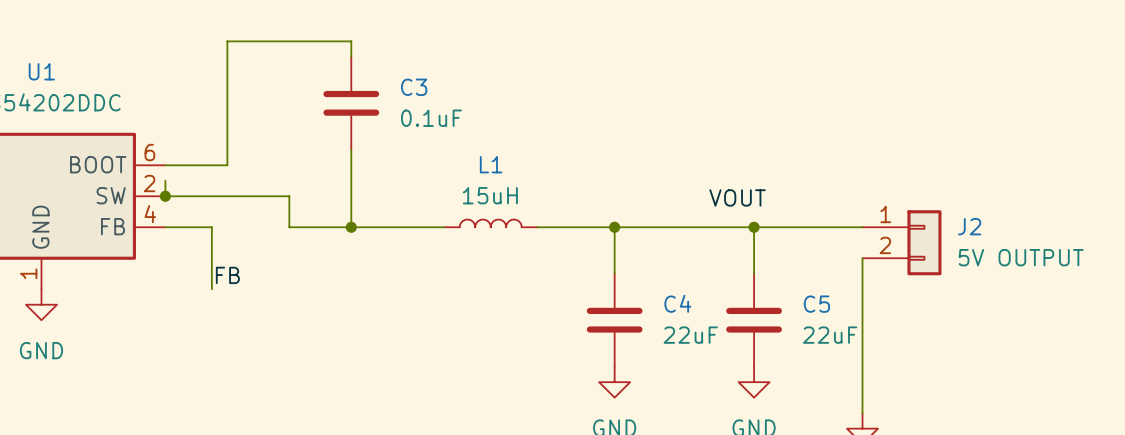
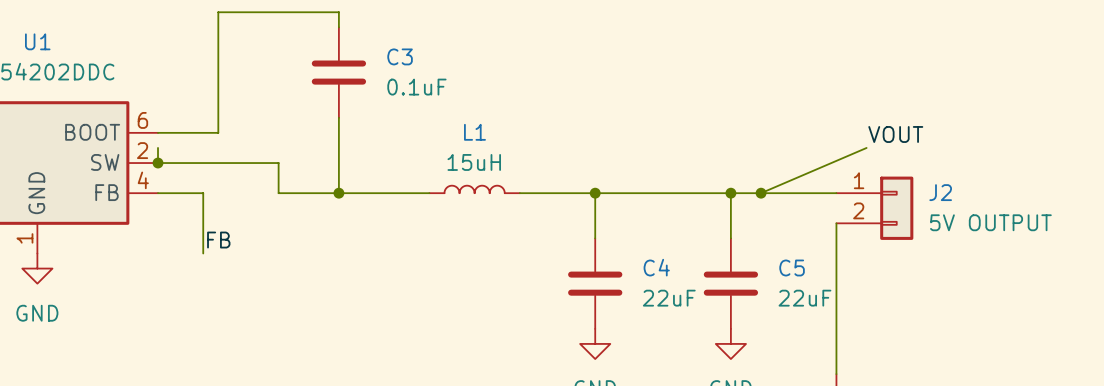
wire: none -> (866, 147) (761, 193)
label position: VOUT (737, 197) -> VOUT (895, 134)
junction: none -> (761, 193)

